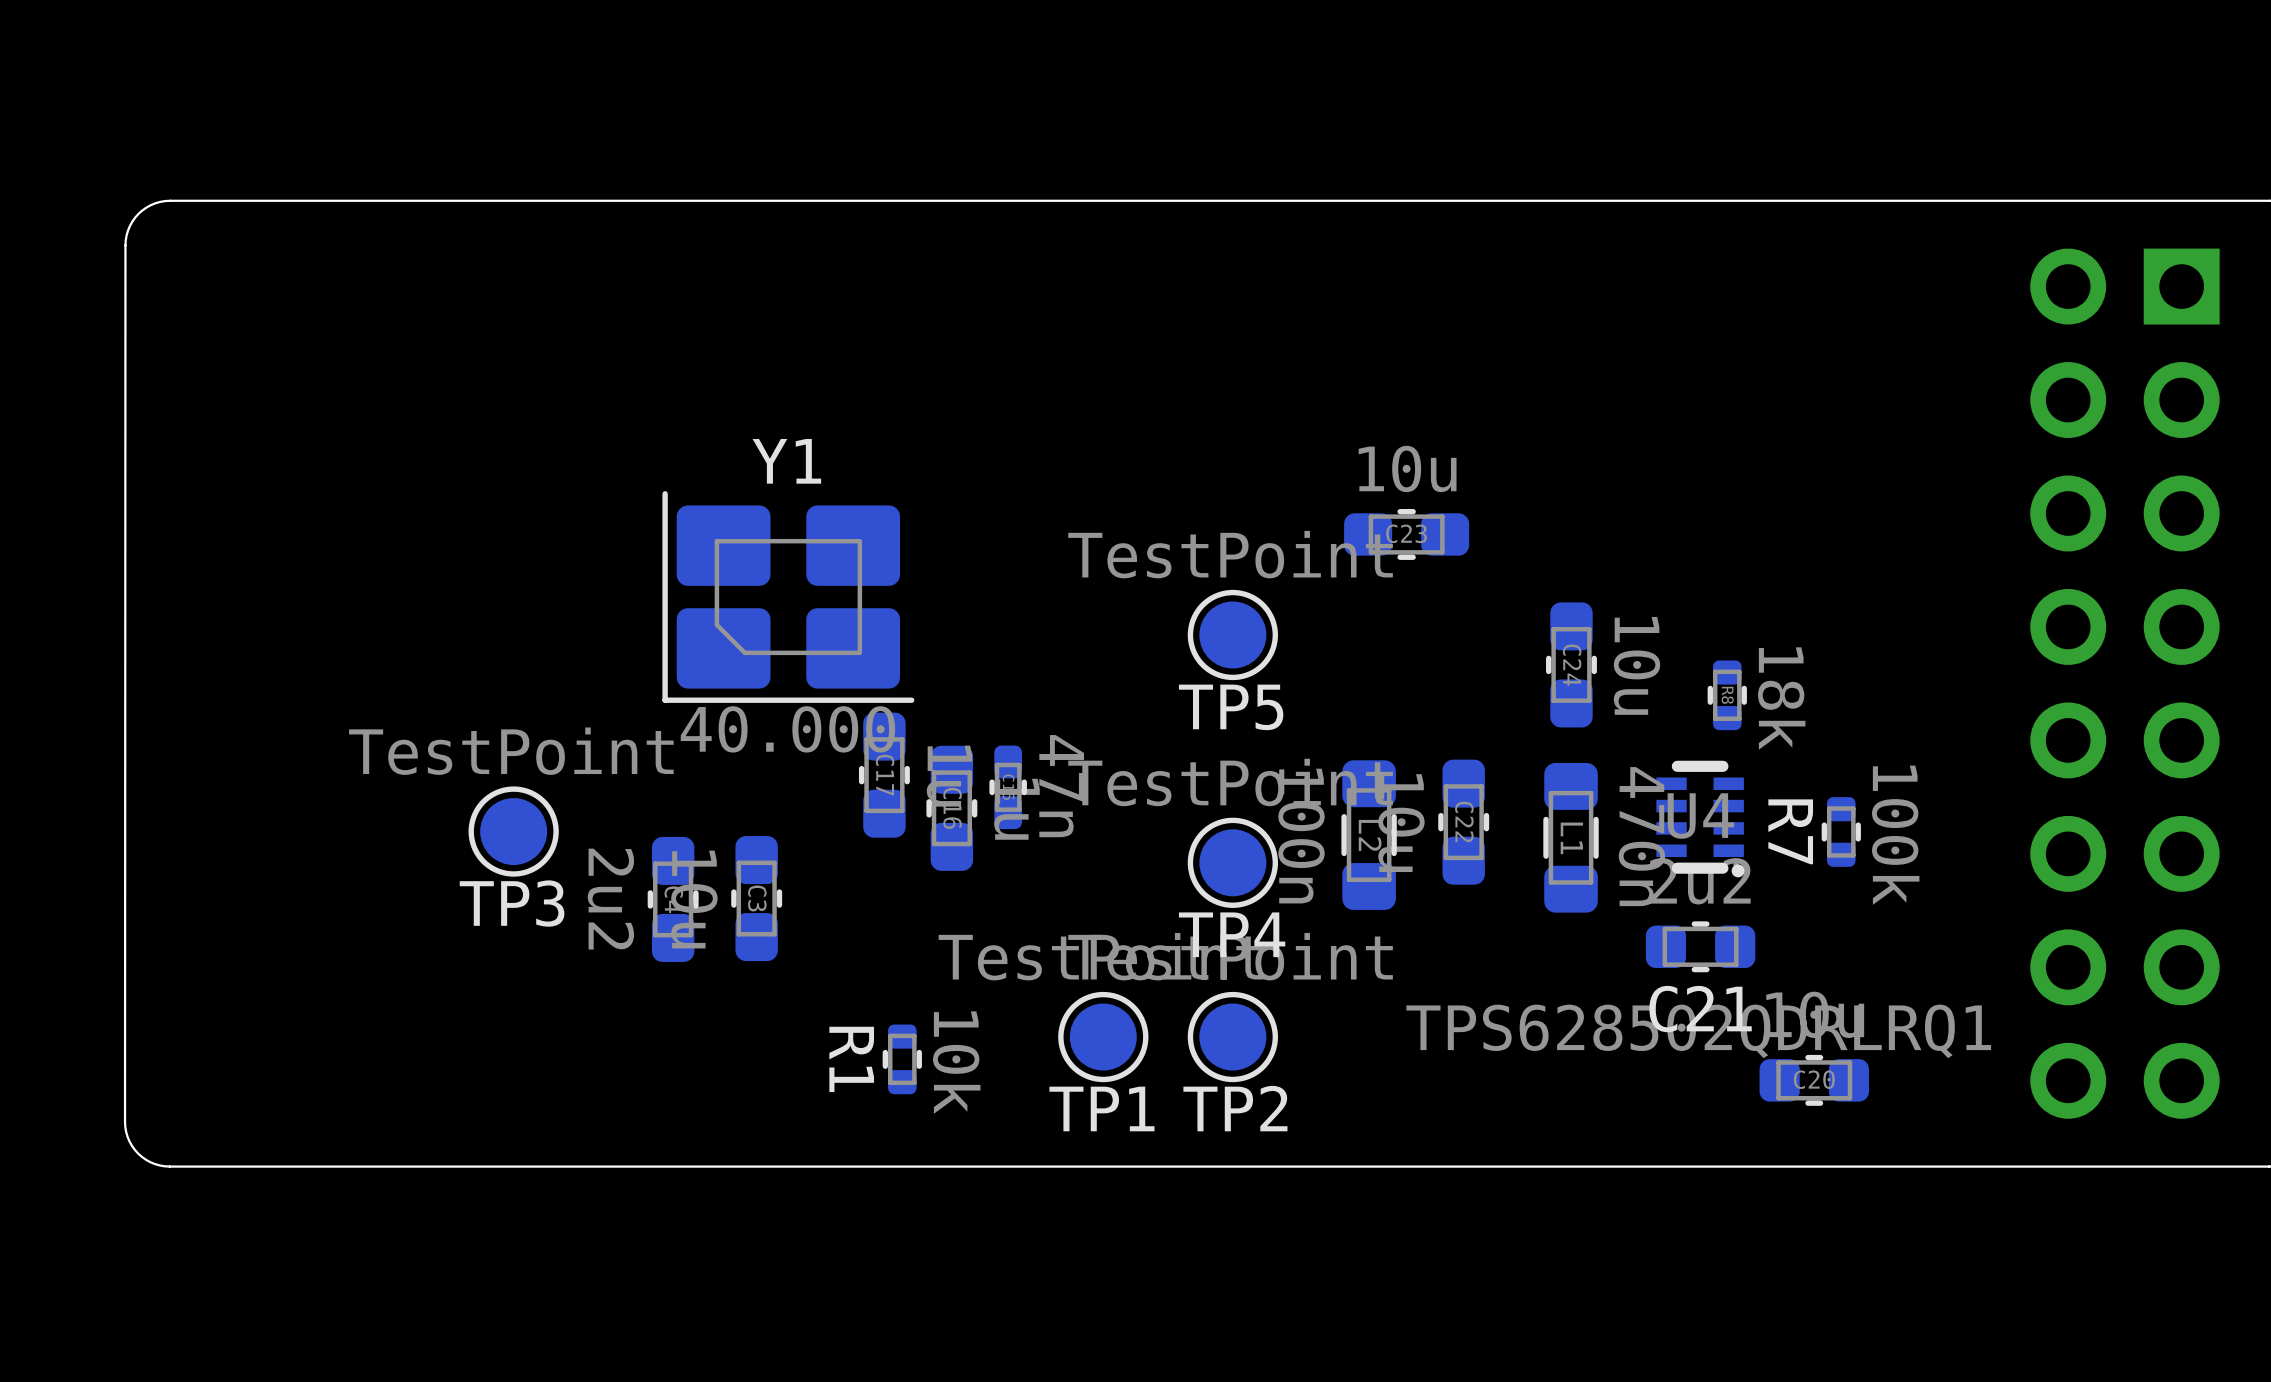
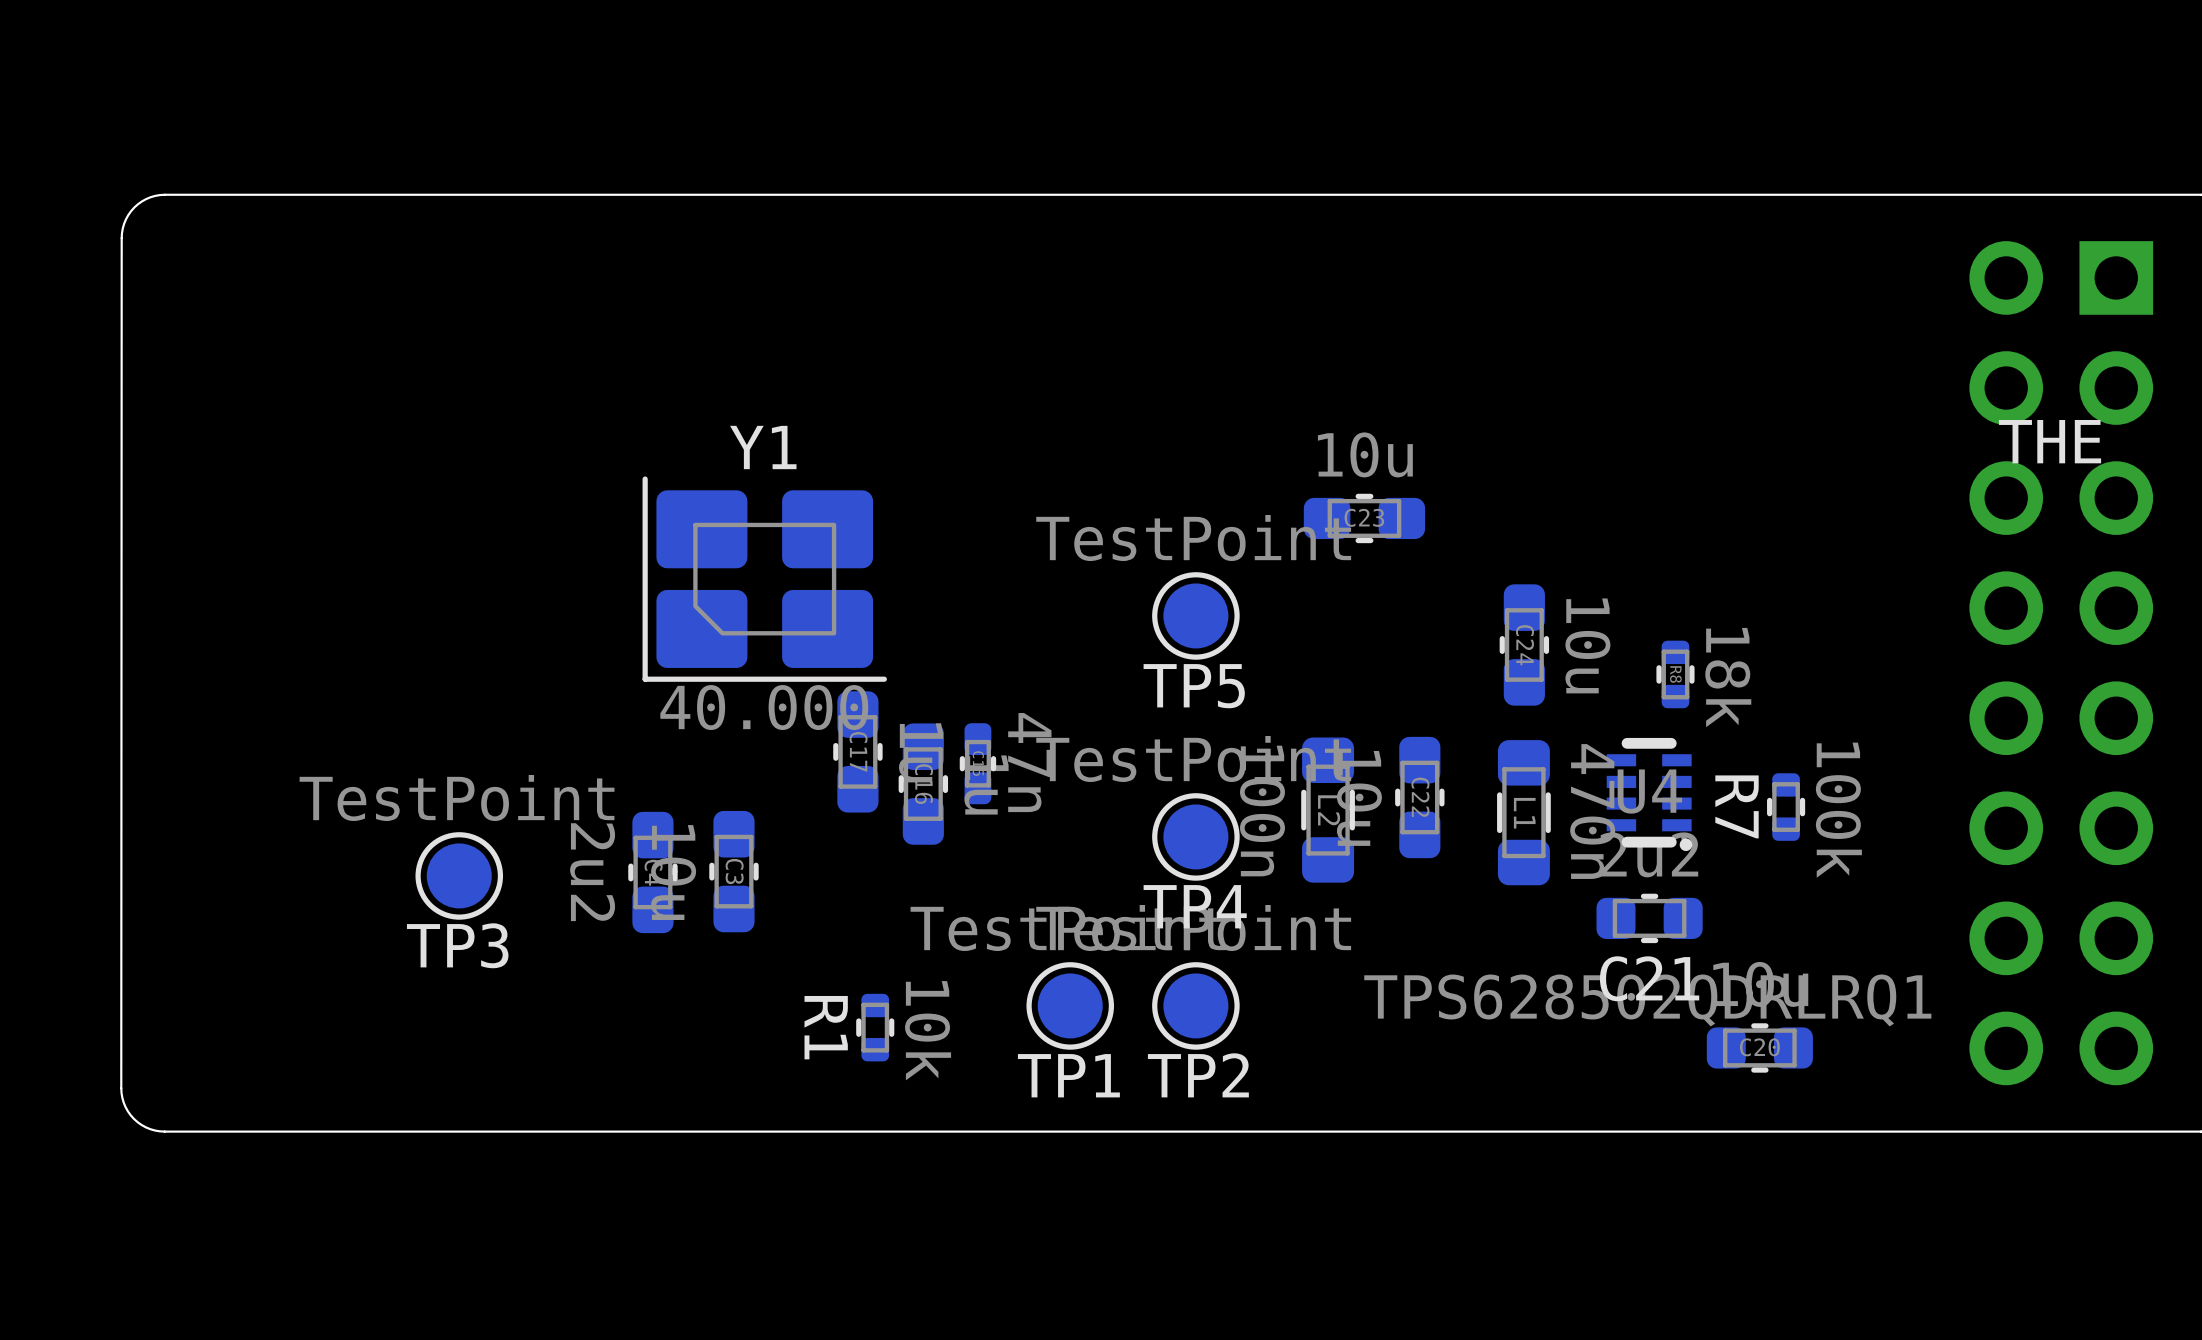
text: none -> THE (2050, 441)
TP3 position: (513, 831) -> (459, 875)

